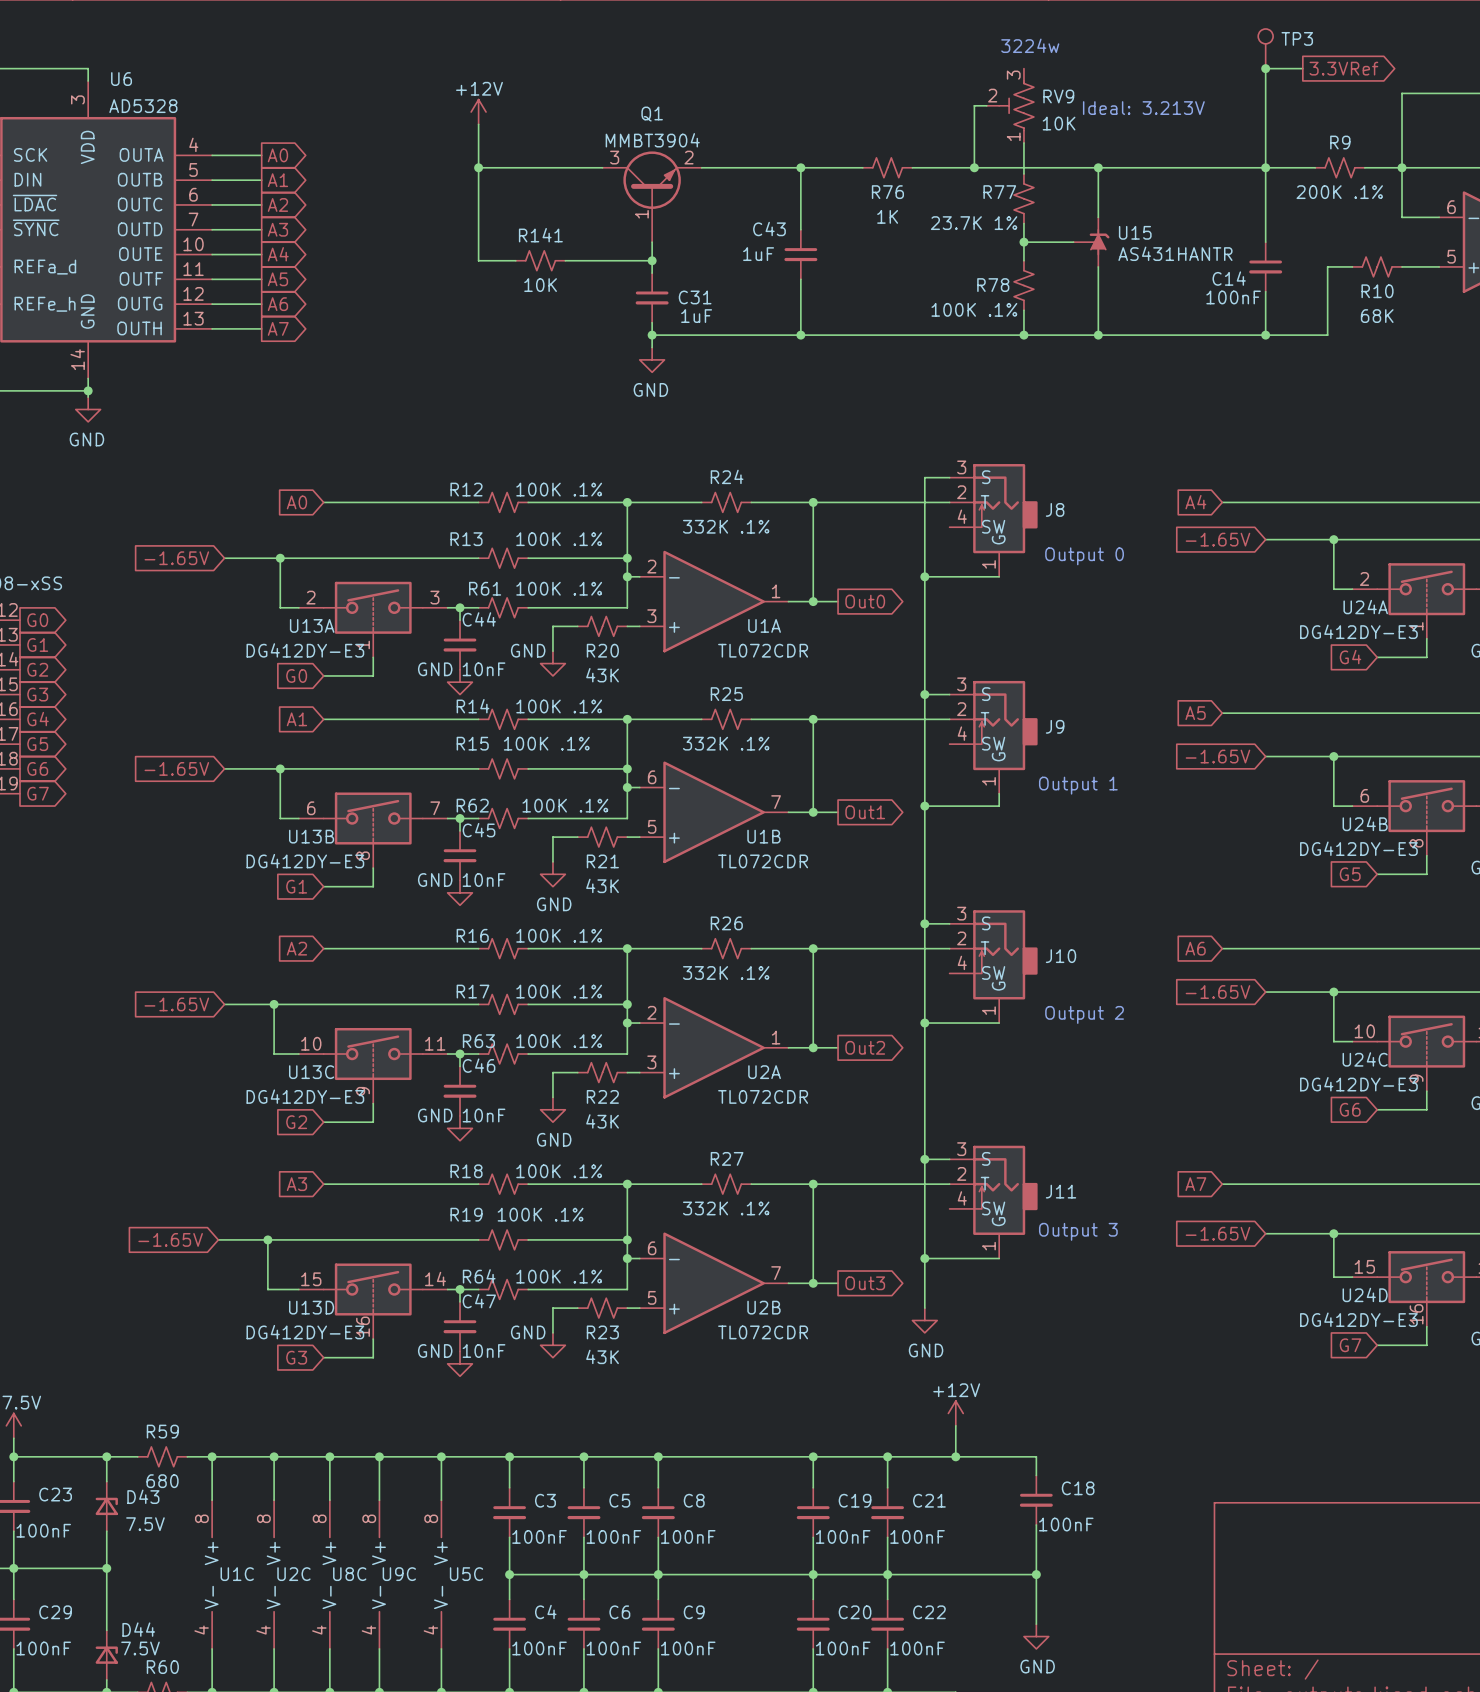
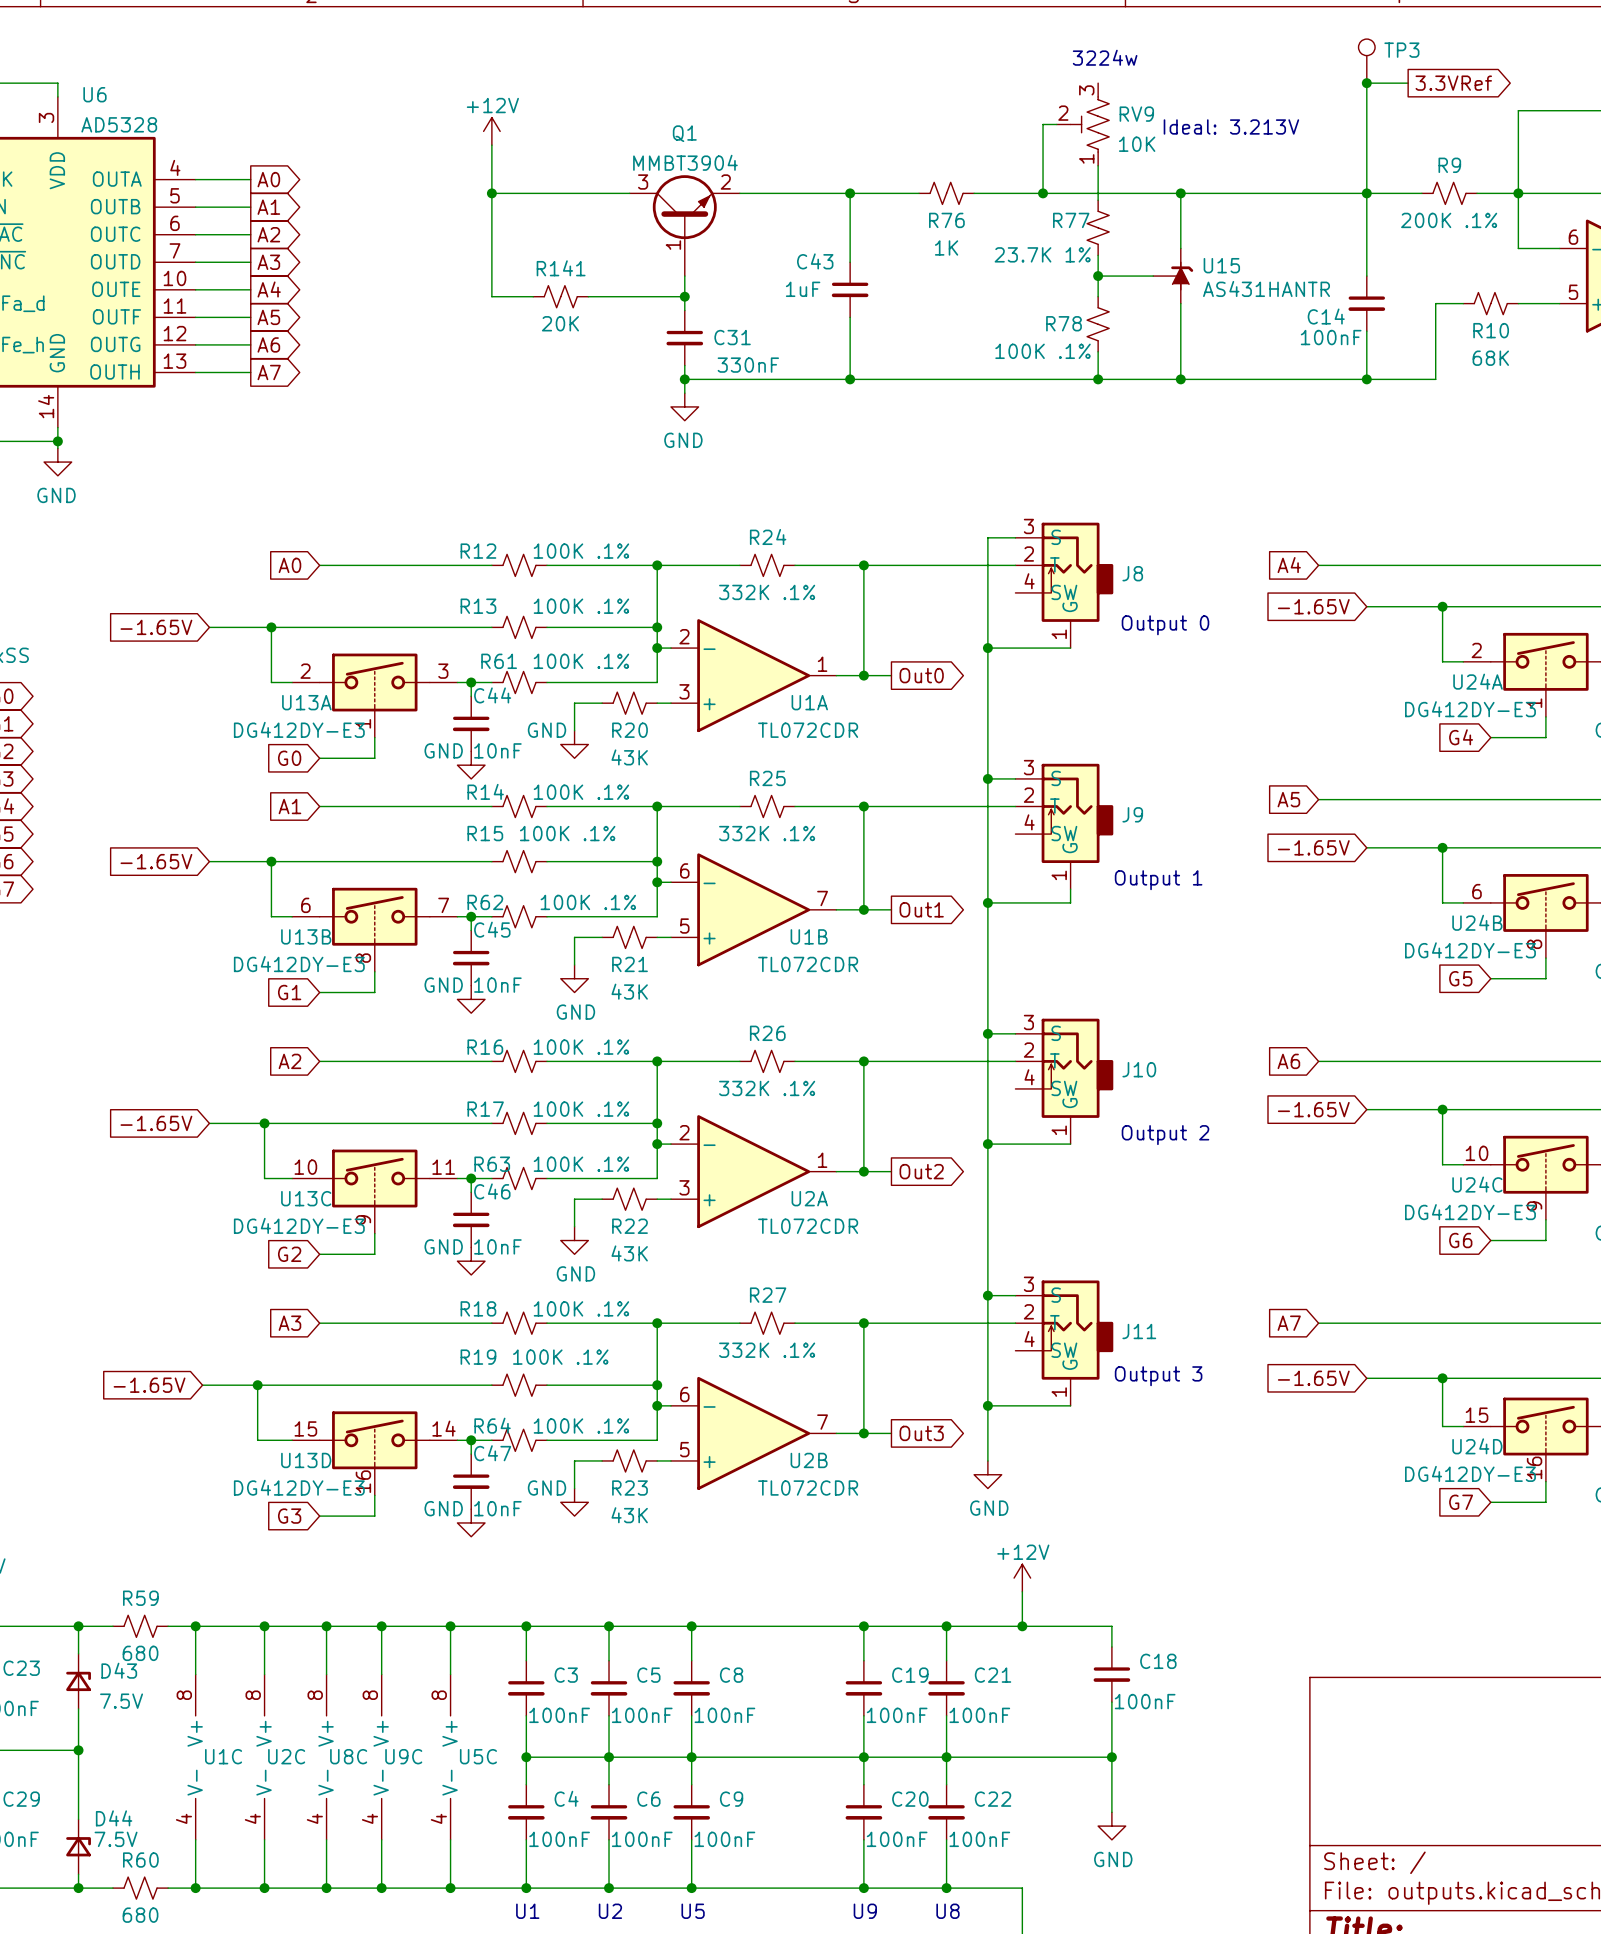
R141 value: 10K (540, 285) -> 20K (560, 323)
C31 value: 1uF (696, 316) -> 330nF (748, 365)

